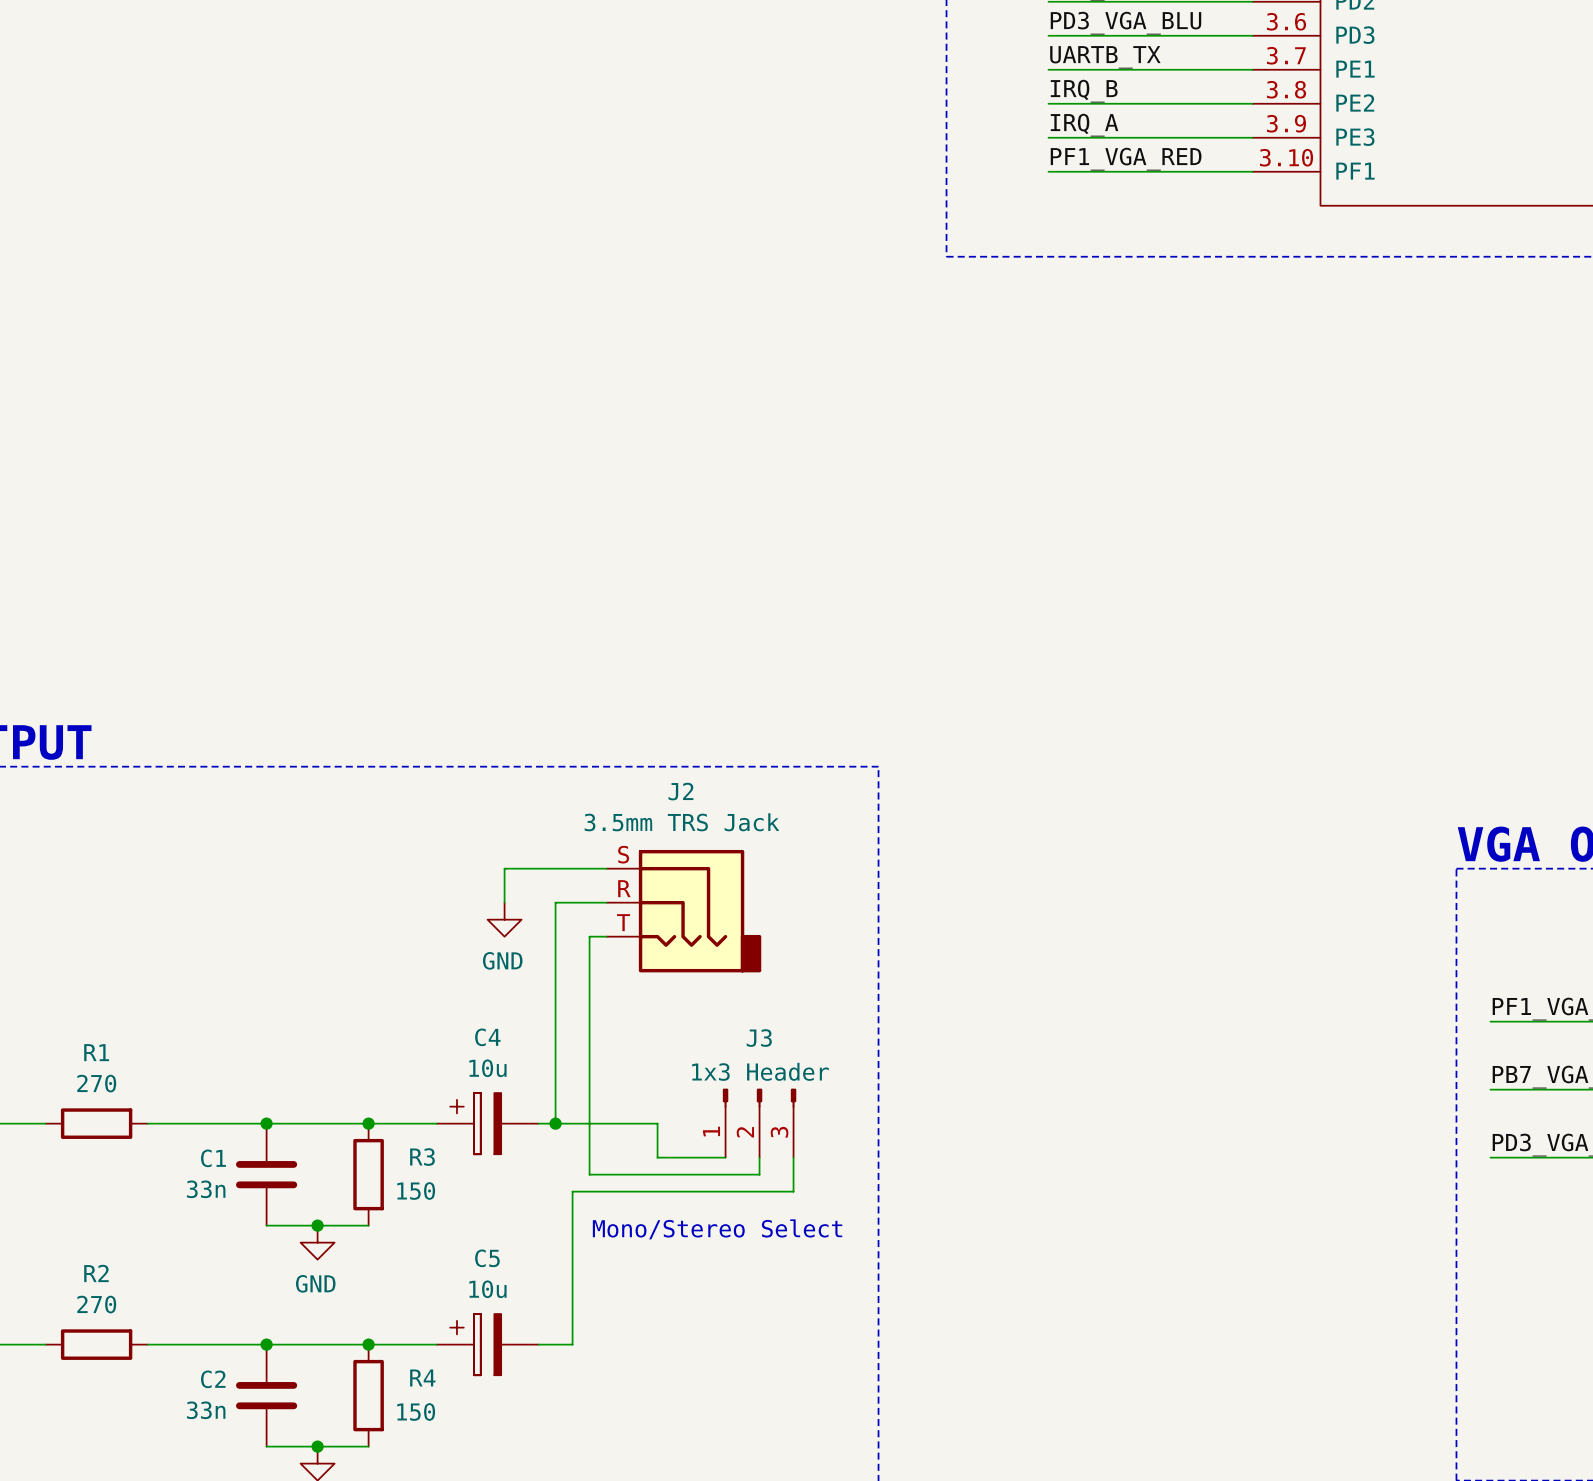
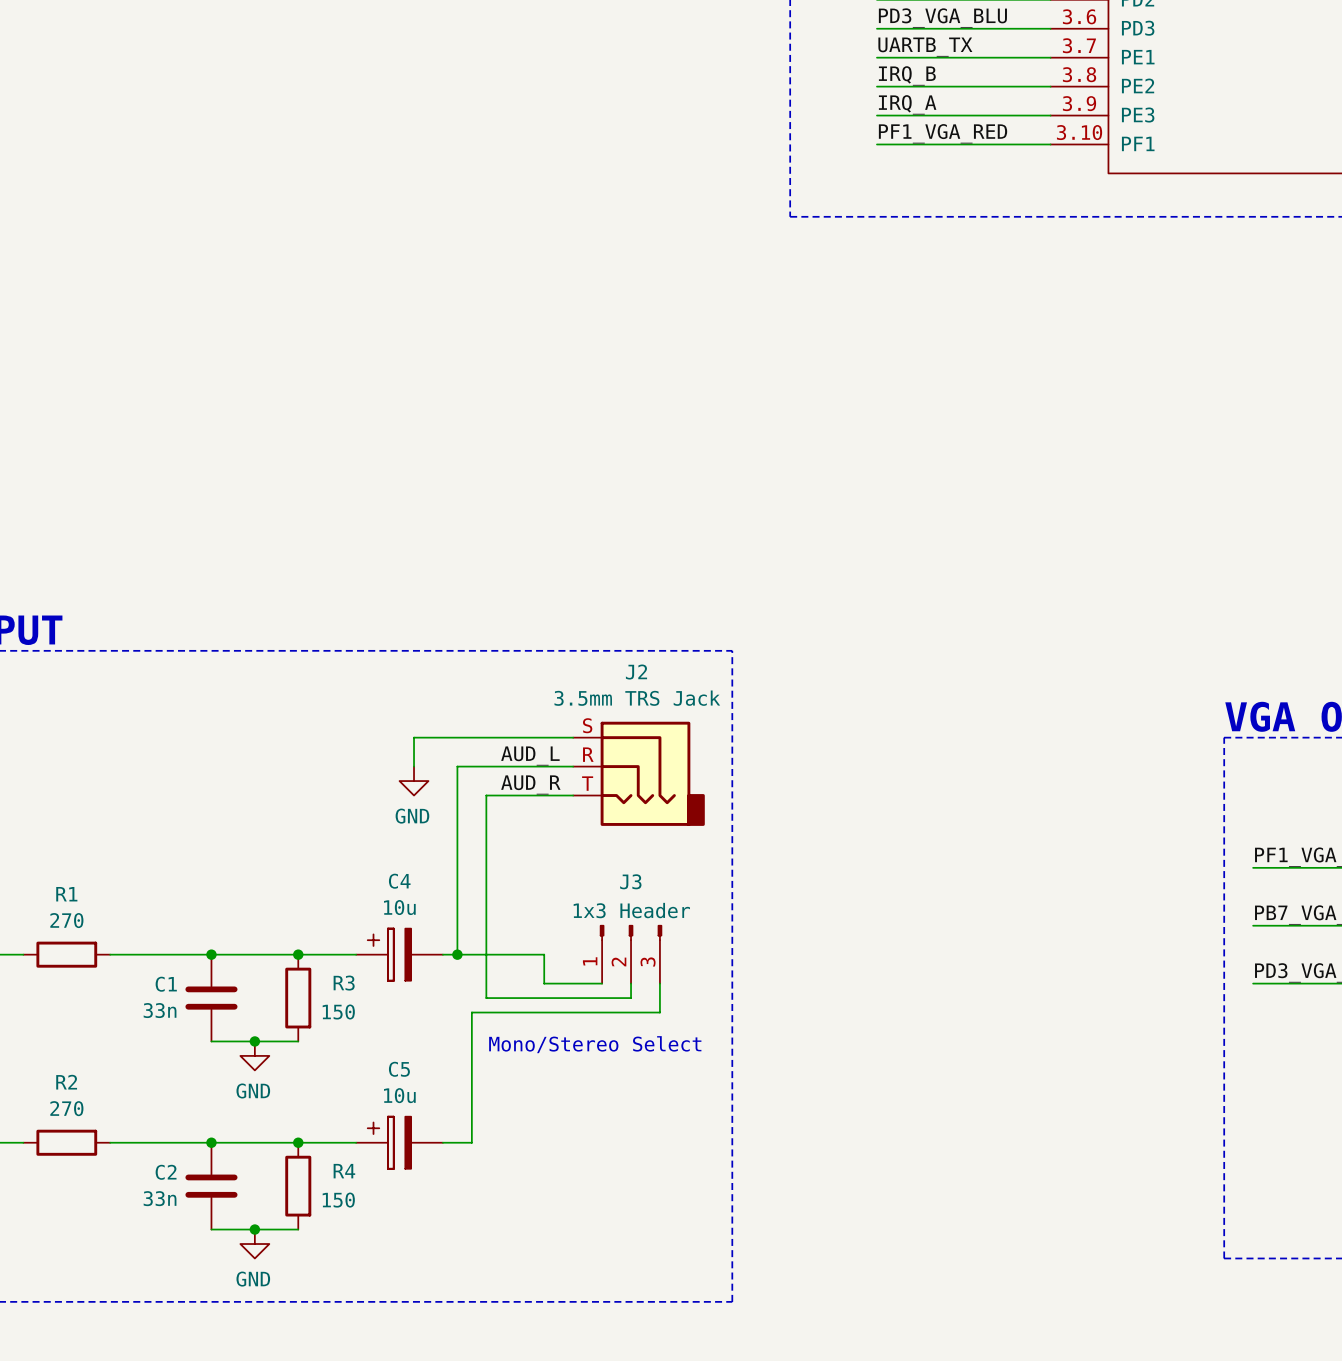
label: none -> AUD_L (530, 756)
J2 position: (683, 911) -> (638, 773)
label: none -> AUD_R (530, 784)

